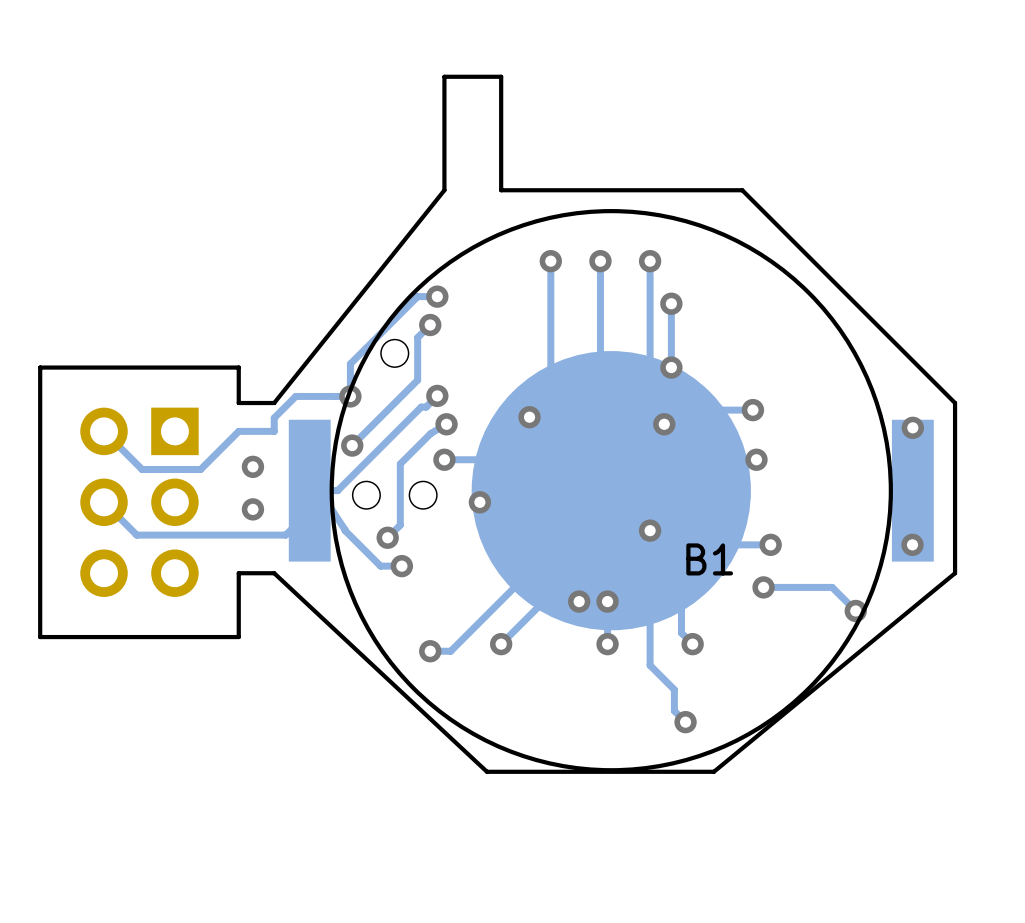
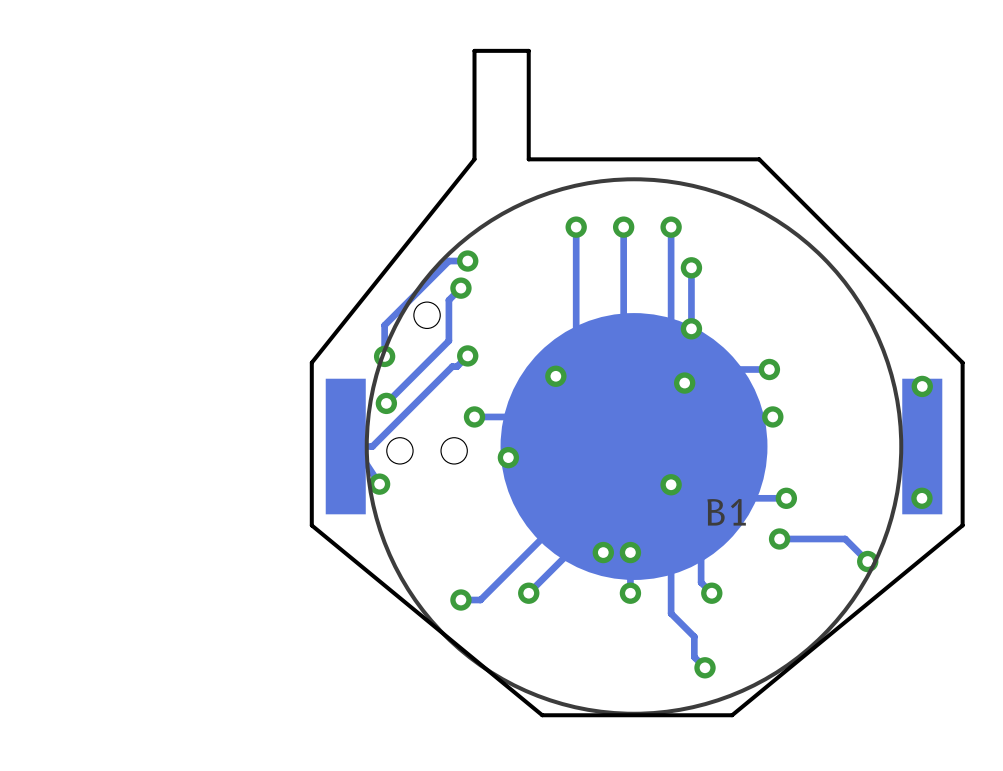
track: (350, 396) (295, 396) (274, 417) (274, 431) (238, 431) (200, 469) (142, 469) (104, 431) -> none
board edge: (274, 403) (238, 403) (238, 367) (40, 367) (40, 637) (238, 637) (238, 573) (274, 573) (486, 771) (515, 771) -> (311, 362) (311, 525) (542, 715)
track: (446, 424) (430, 433) (400, 463) (400, 525) (387, 537) -> none
via: (446, 424) -> none
via: (252, 466) -> none
track: (309, 490) (309, 511) (285, 535) (136, 535) (104, 502) -> none
part: (139, 502) -> none
via: (252, 509) -> none
track: (345, 530) (380, 566) (401, 566) -> none
via: none -> (379, 484)
via: (387, 537) -> none
via: (401, 566) -> none

